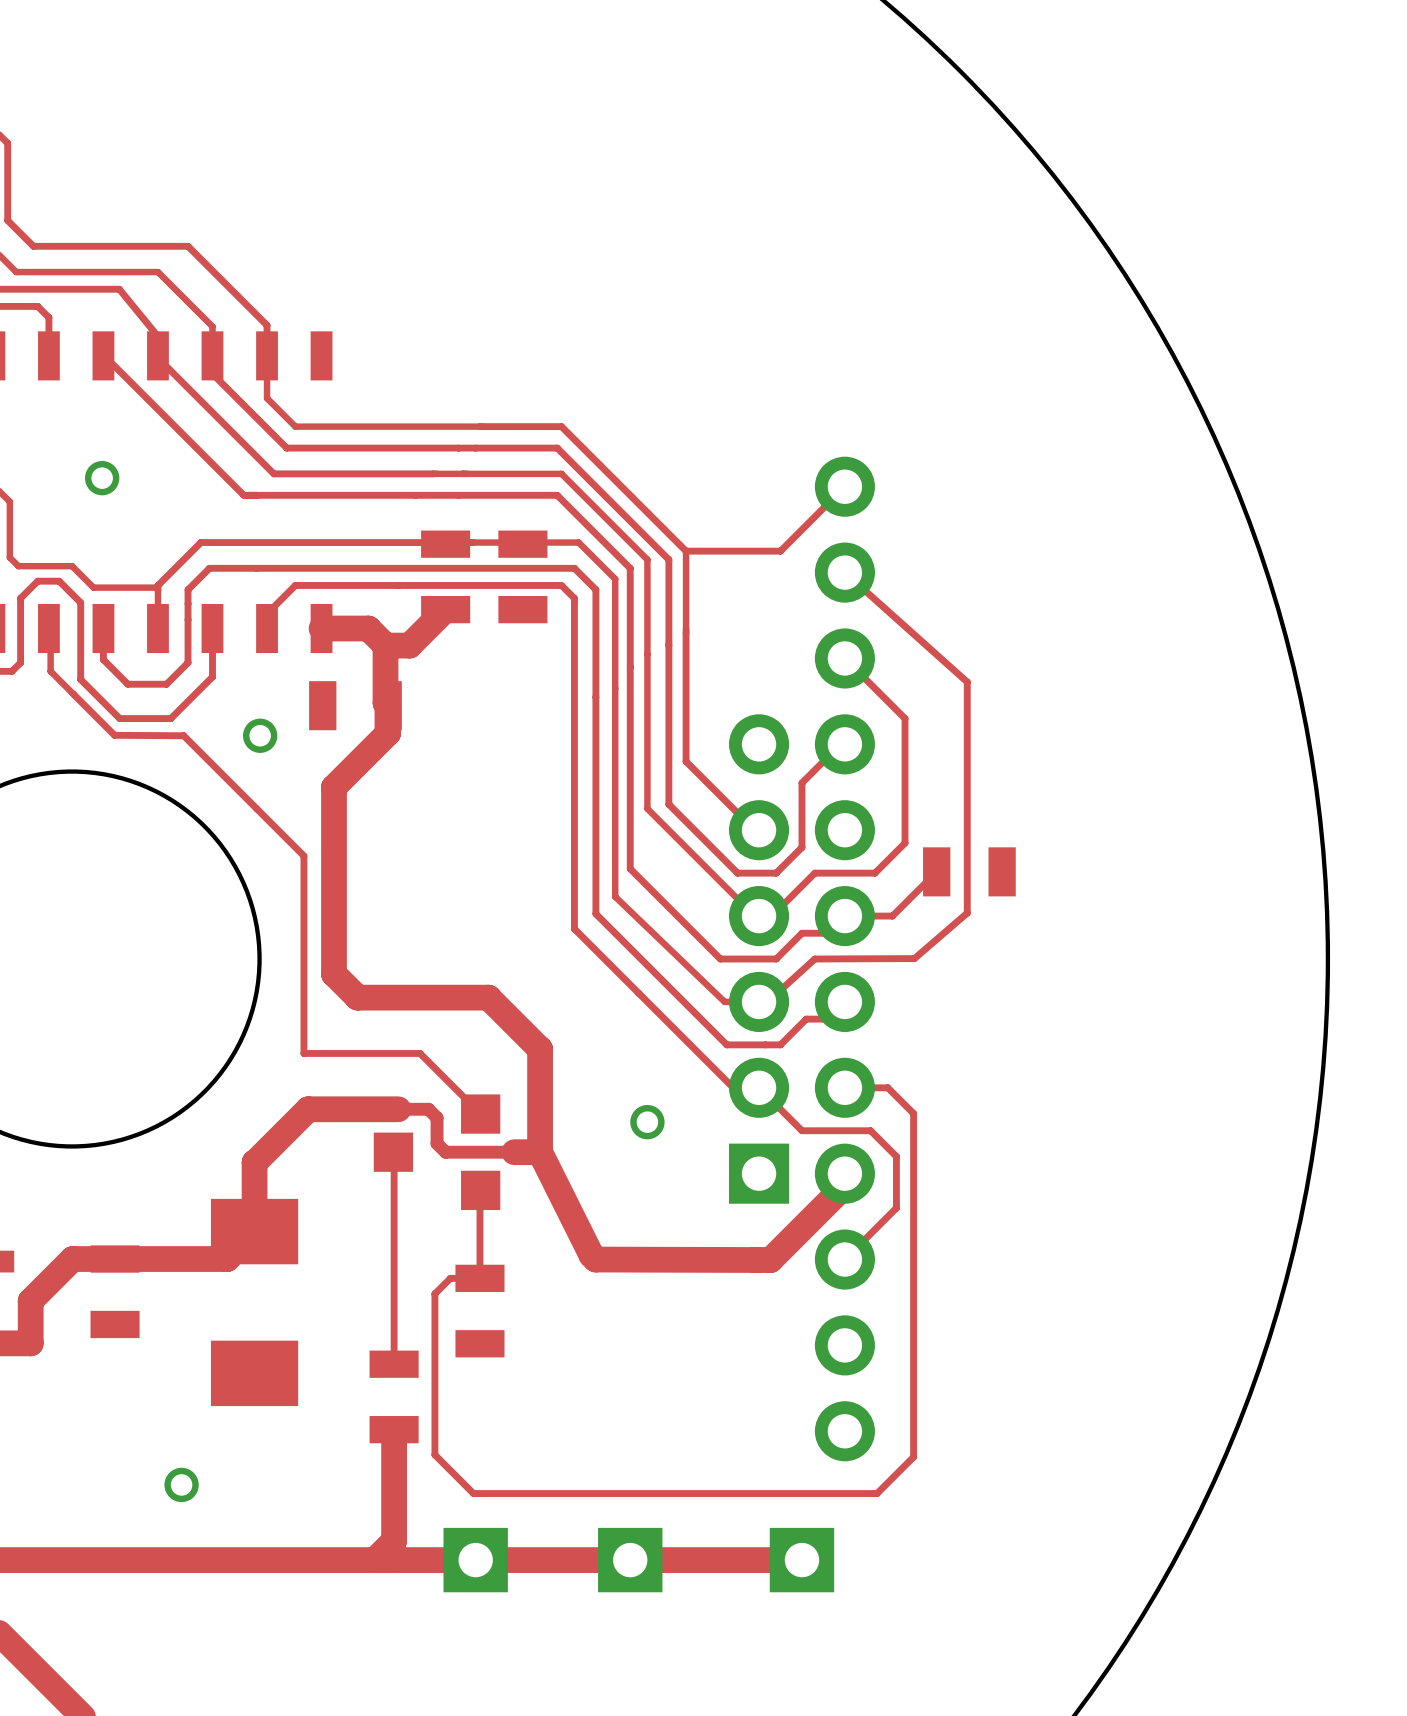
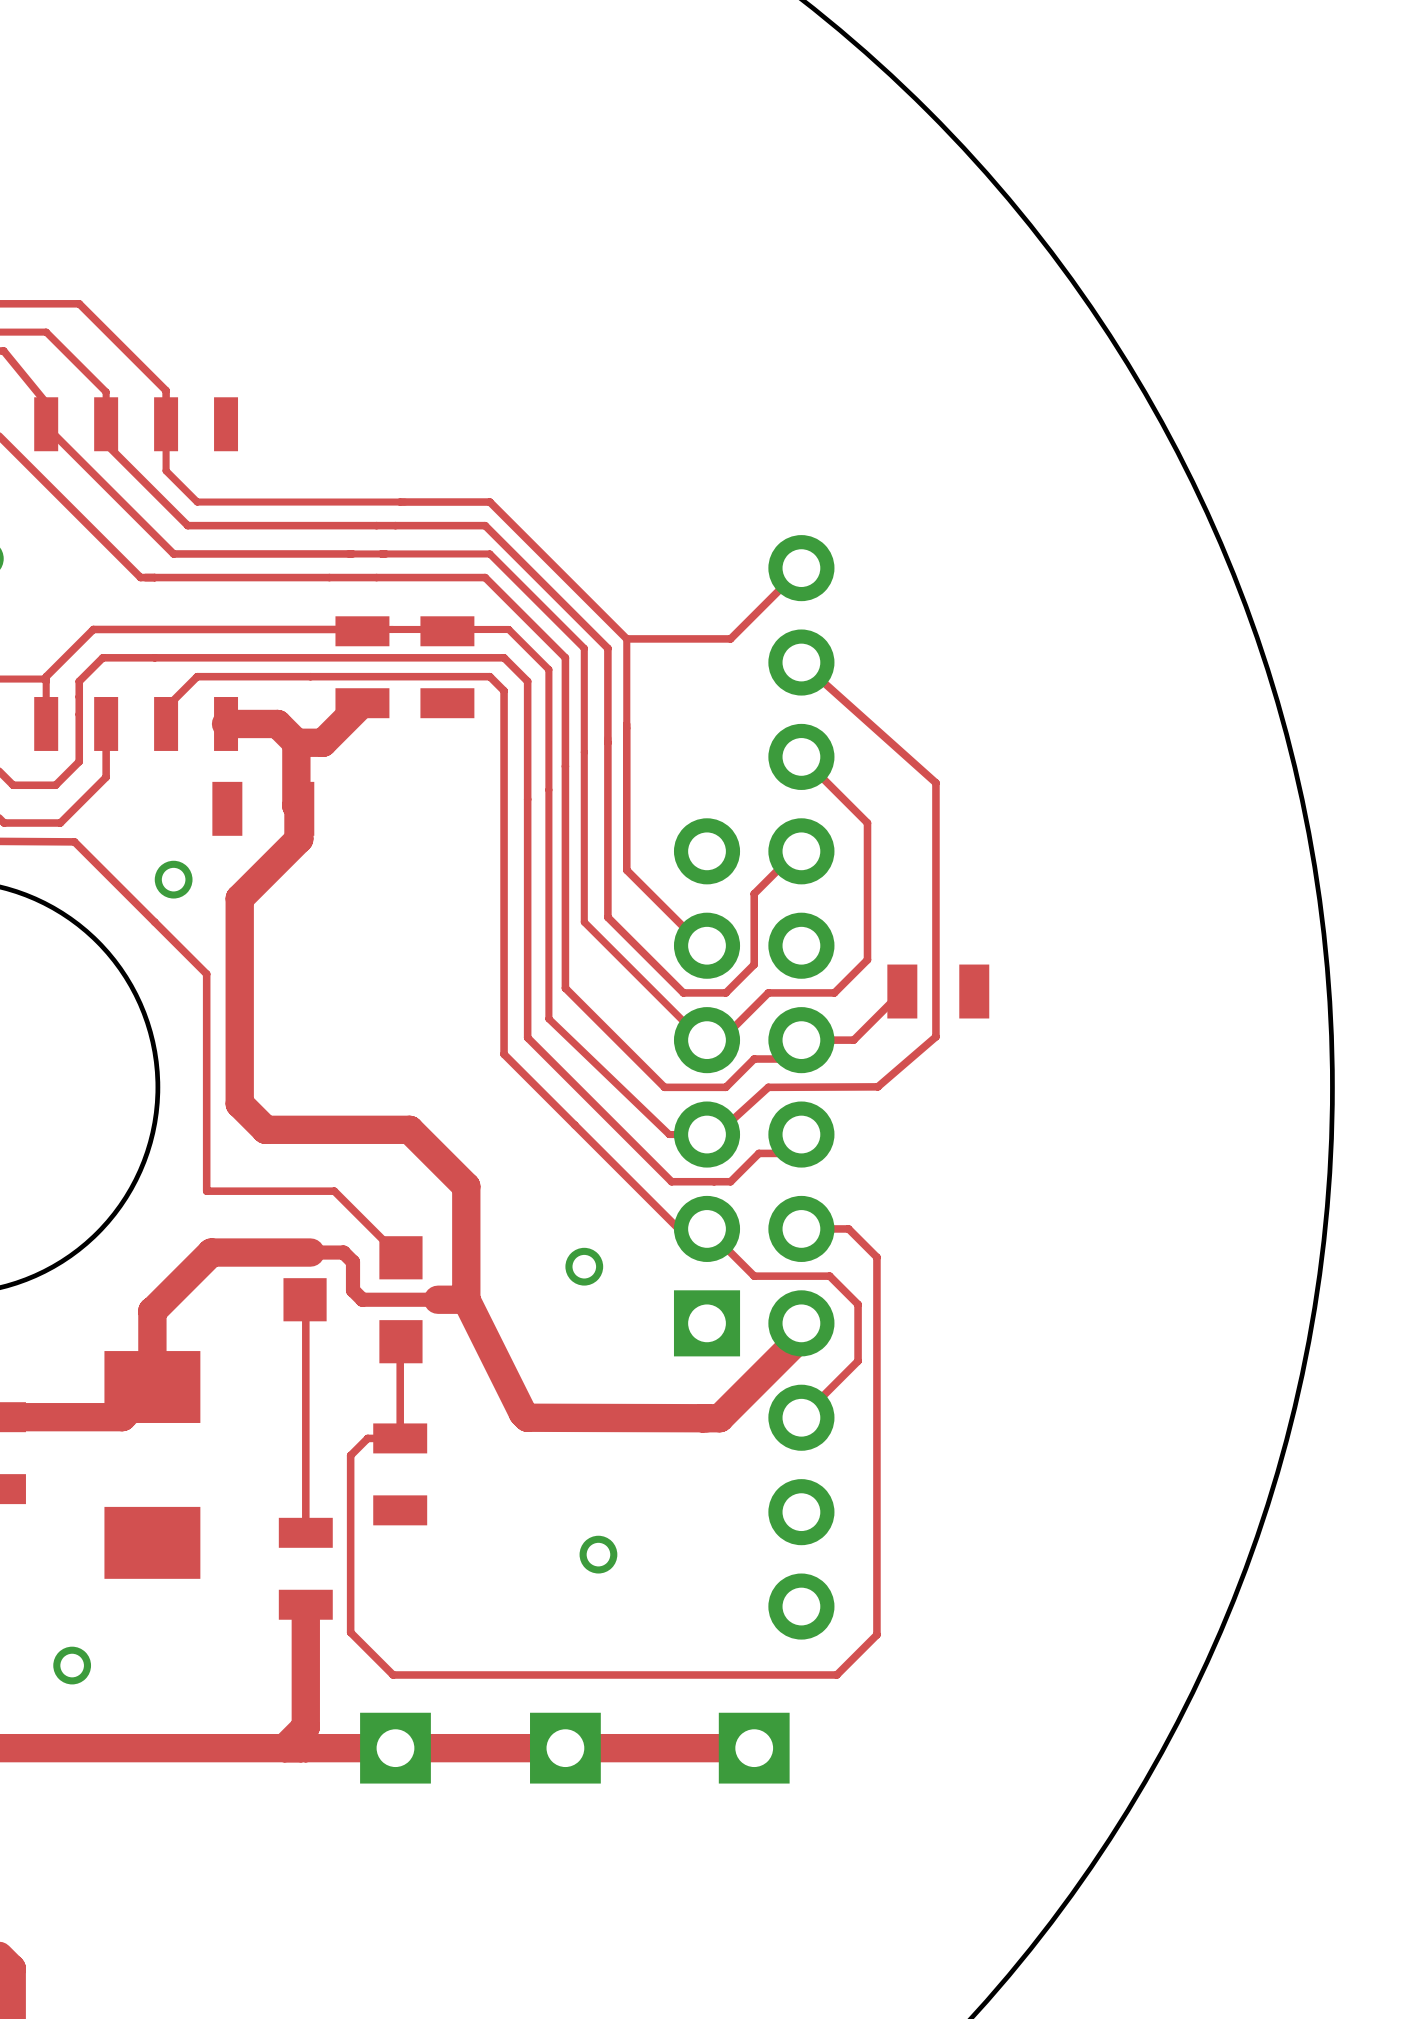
part position: (260, 735) -> (173, 879)
part: none -> (598, 1554)

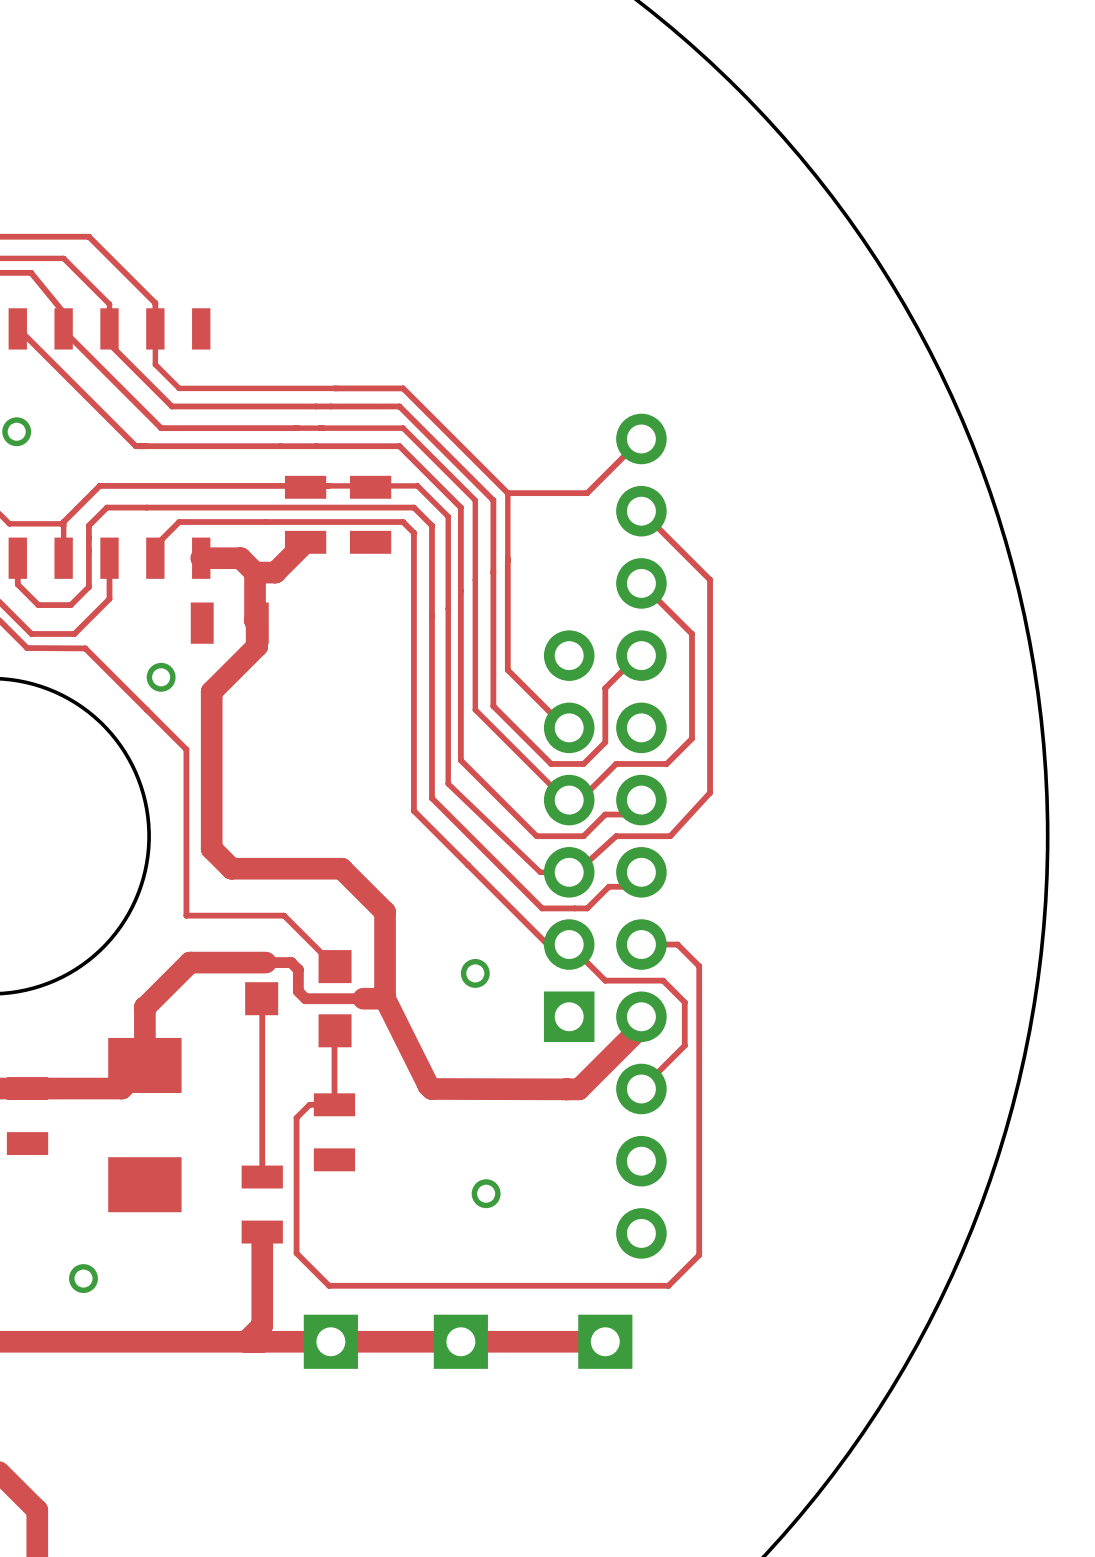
top track: (801, 662) (935, 782) (935, 1036) (877, 1086) (768, 1087) -> (641, 511) (710, 579) (710, 792) (670, 836) (616, 836)
top track: (902, 991) (853, 1040) (801, 1040) -> none
part: (938, 991) -> none

